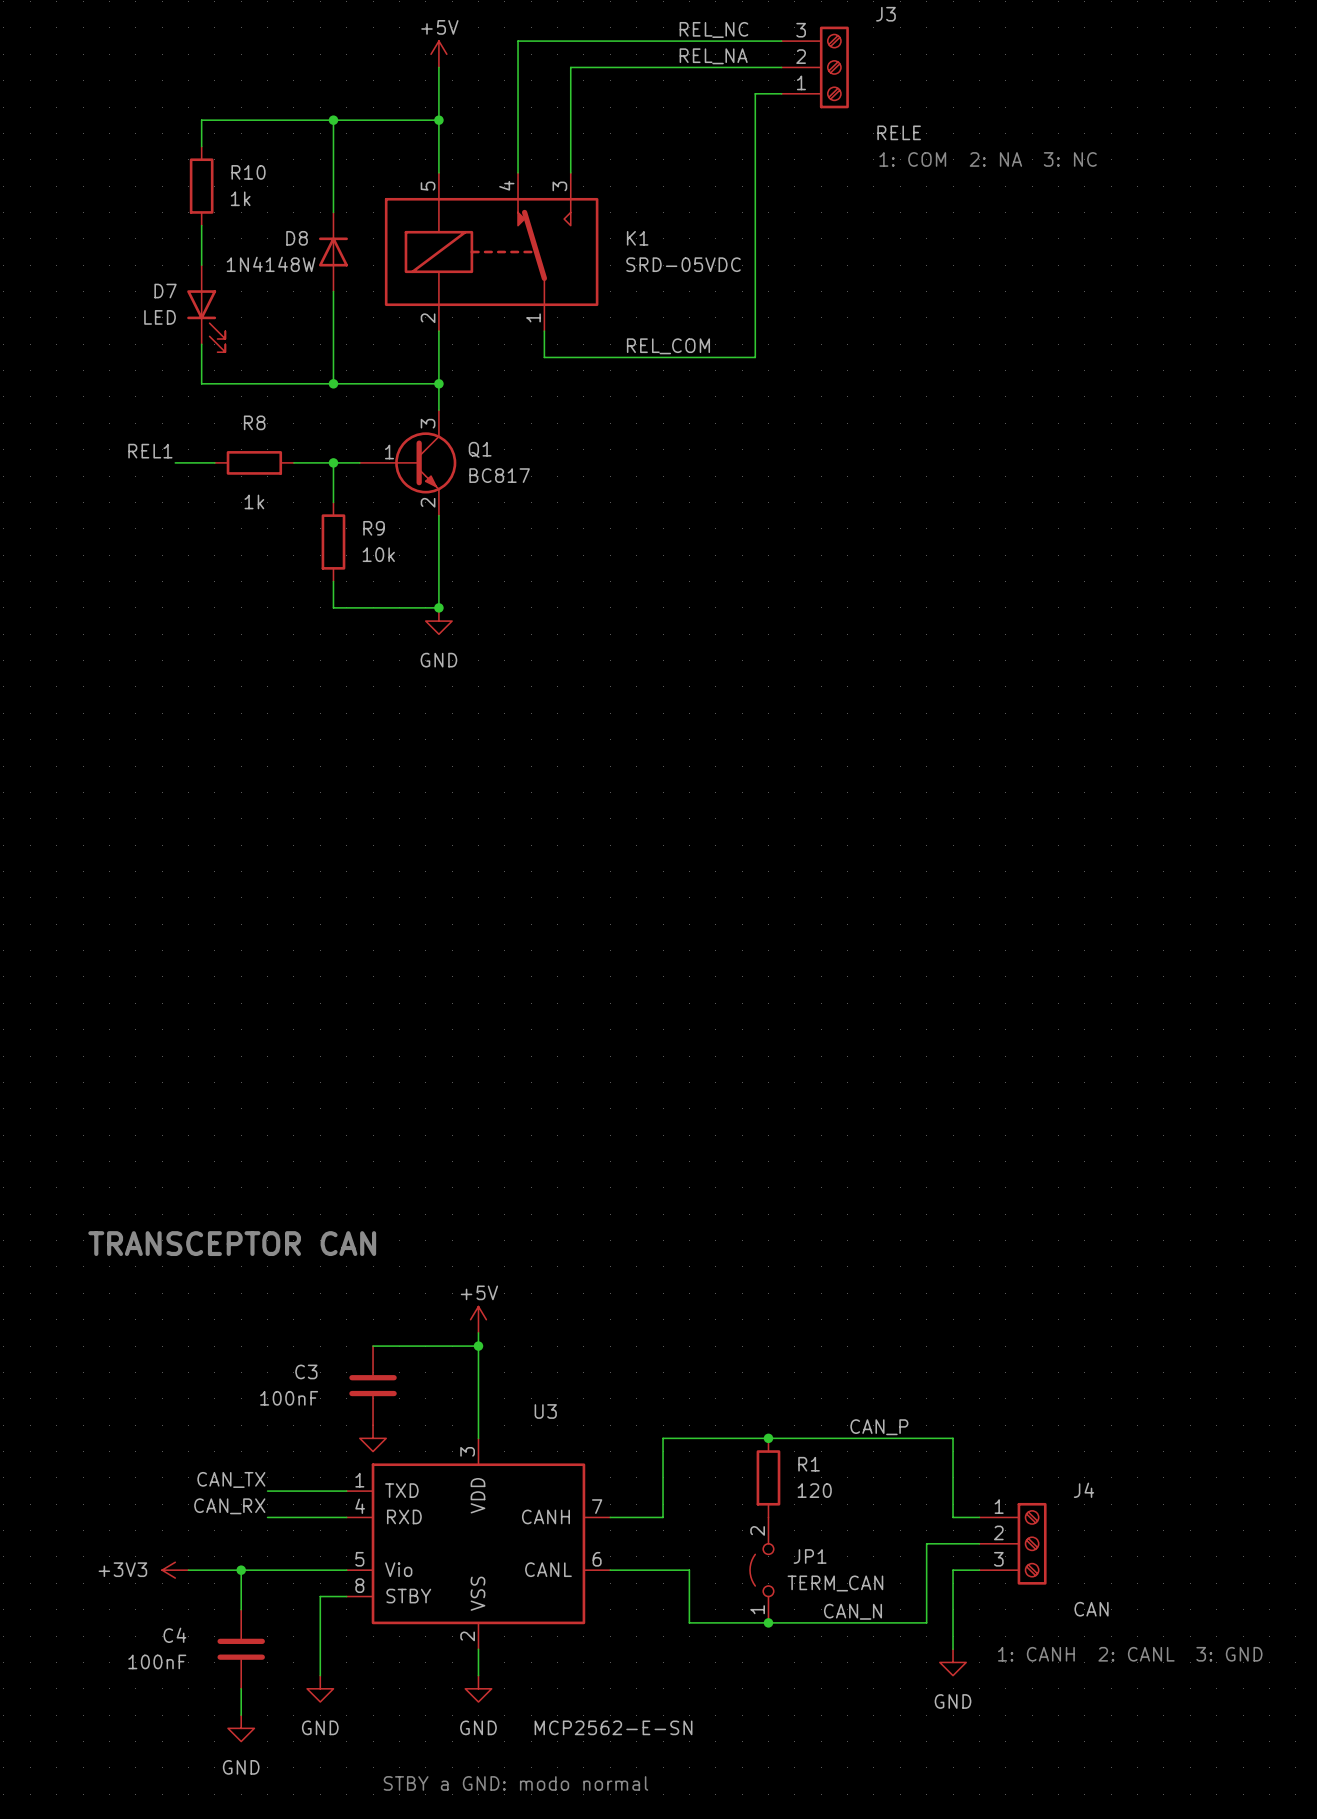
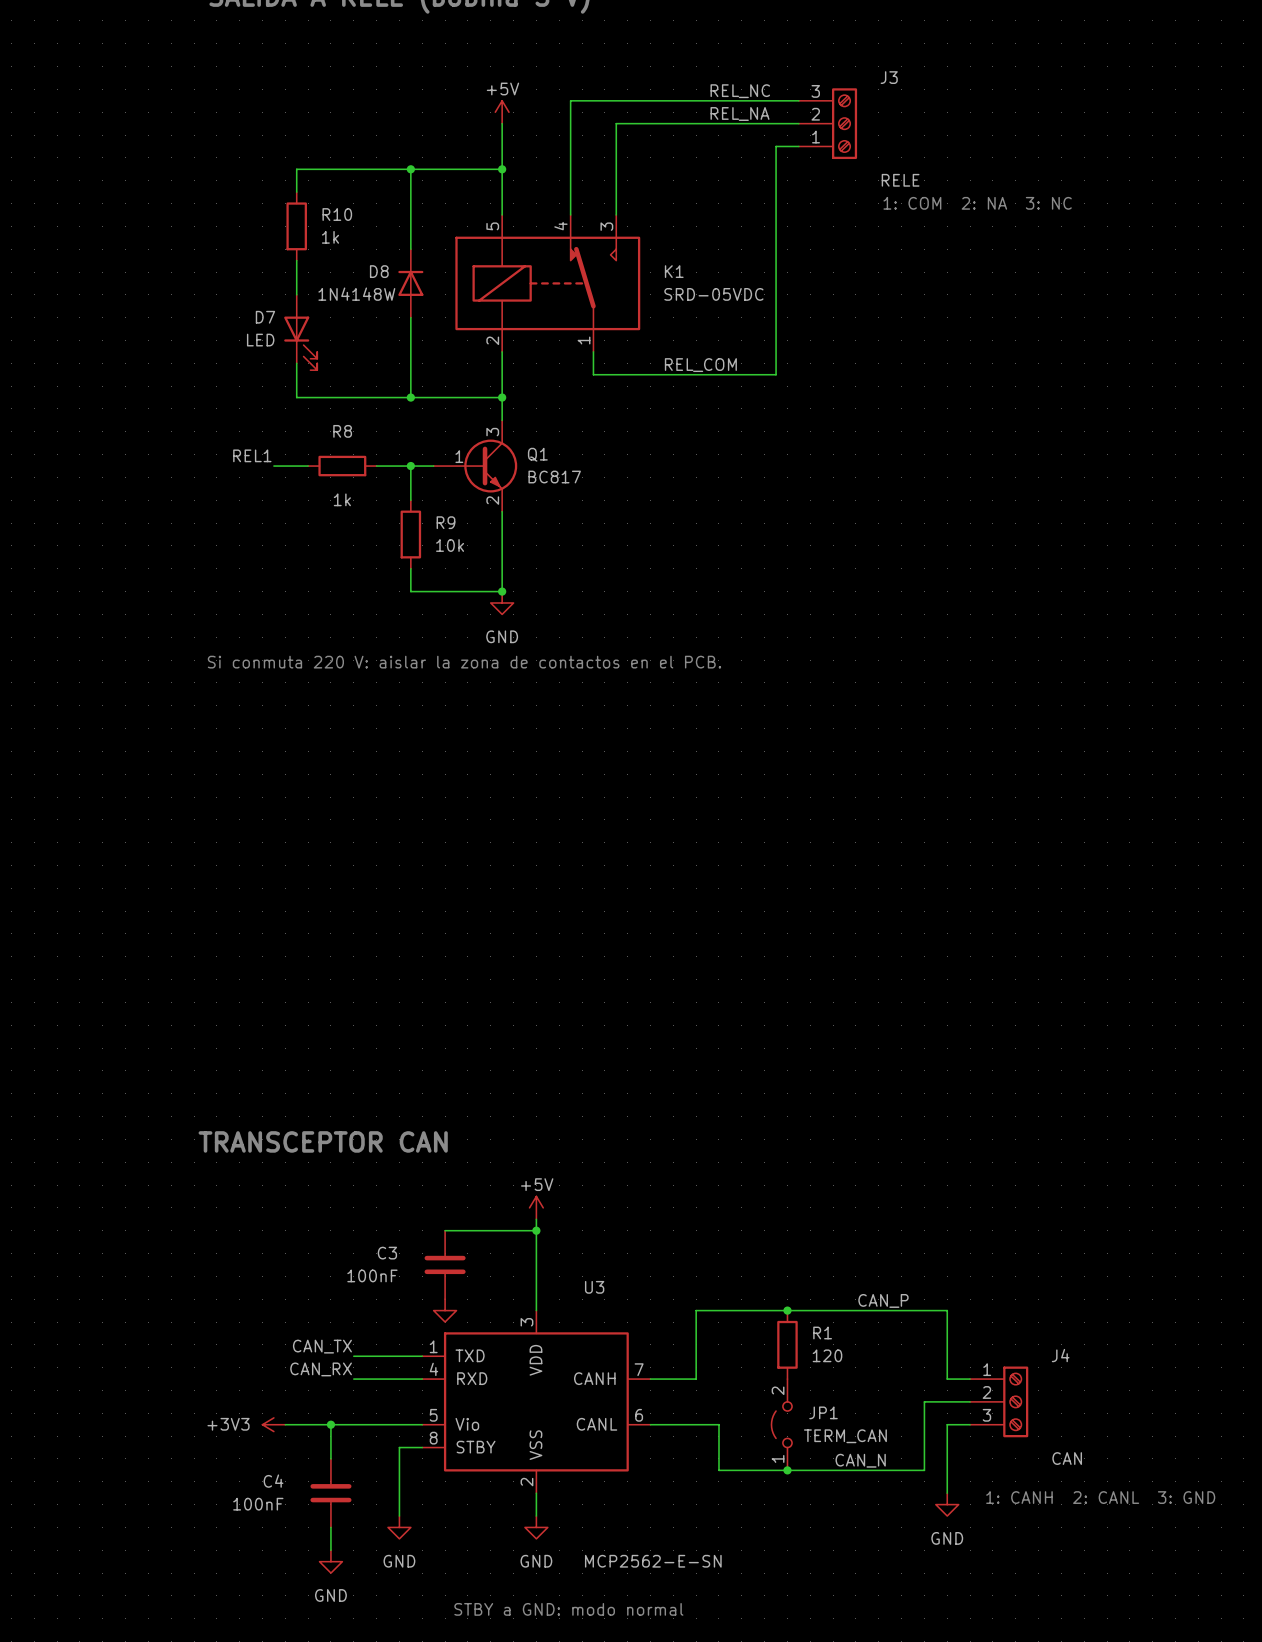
text: none -> Si conmuta 220 V: aislar la zona de contactos en el PCB. (464, 662)

